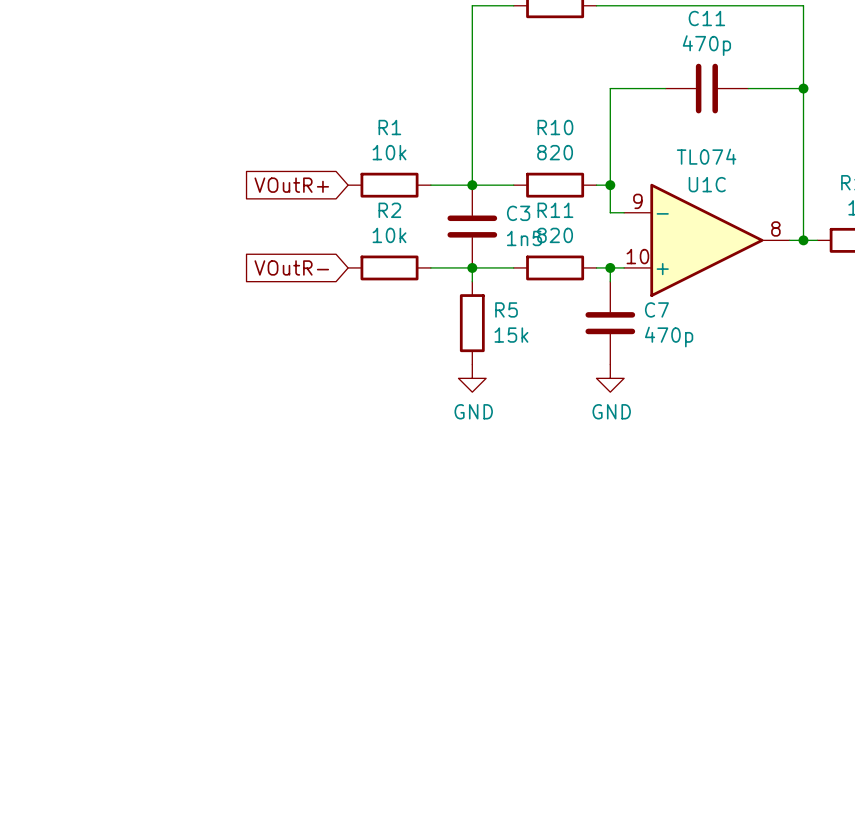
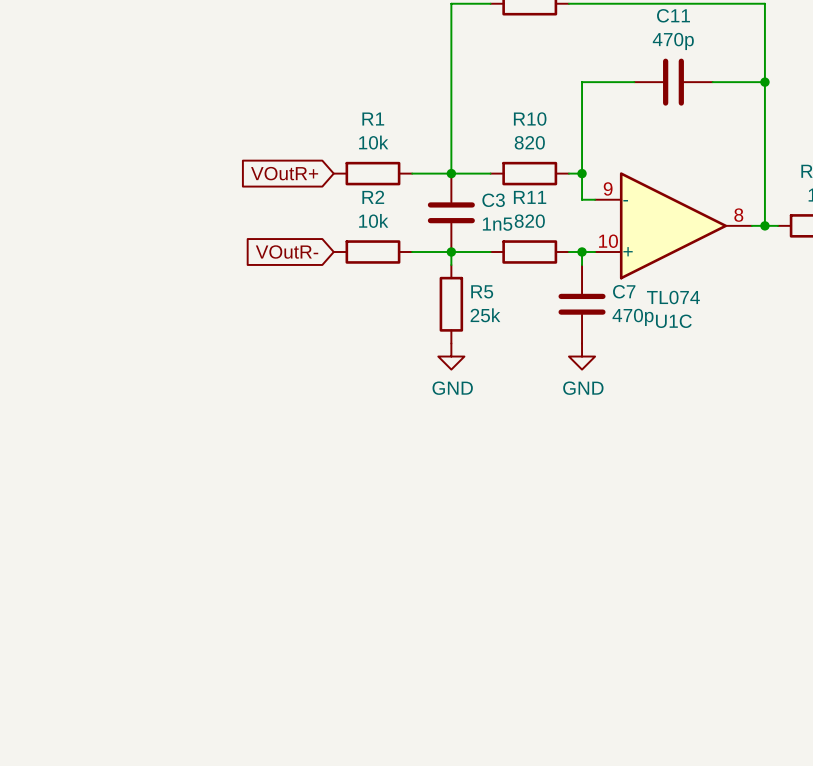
U1C value position: TL074 (706, 156) -> TL074 (673, 297)
U1C name position: U1C (707, 184) -> U1C (673, 321)
R5 value: 15k (511, 335) -> 25k (485, 315)

